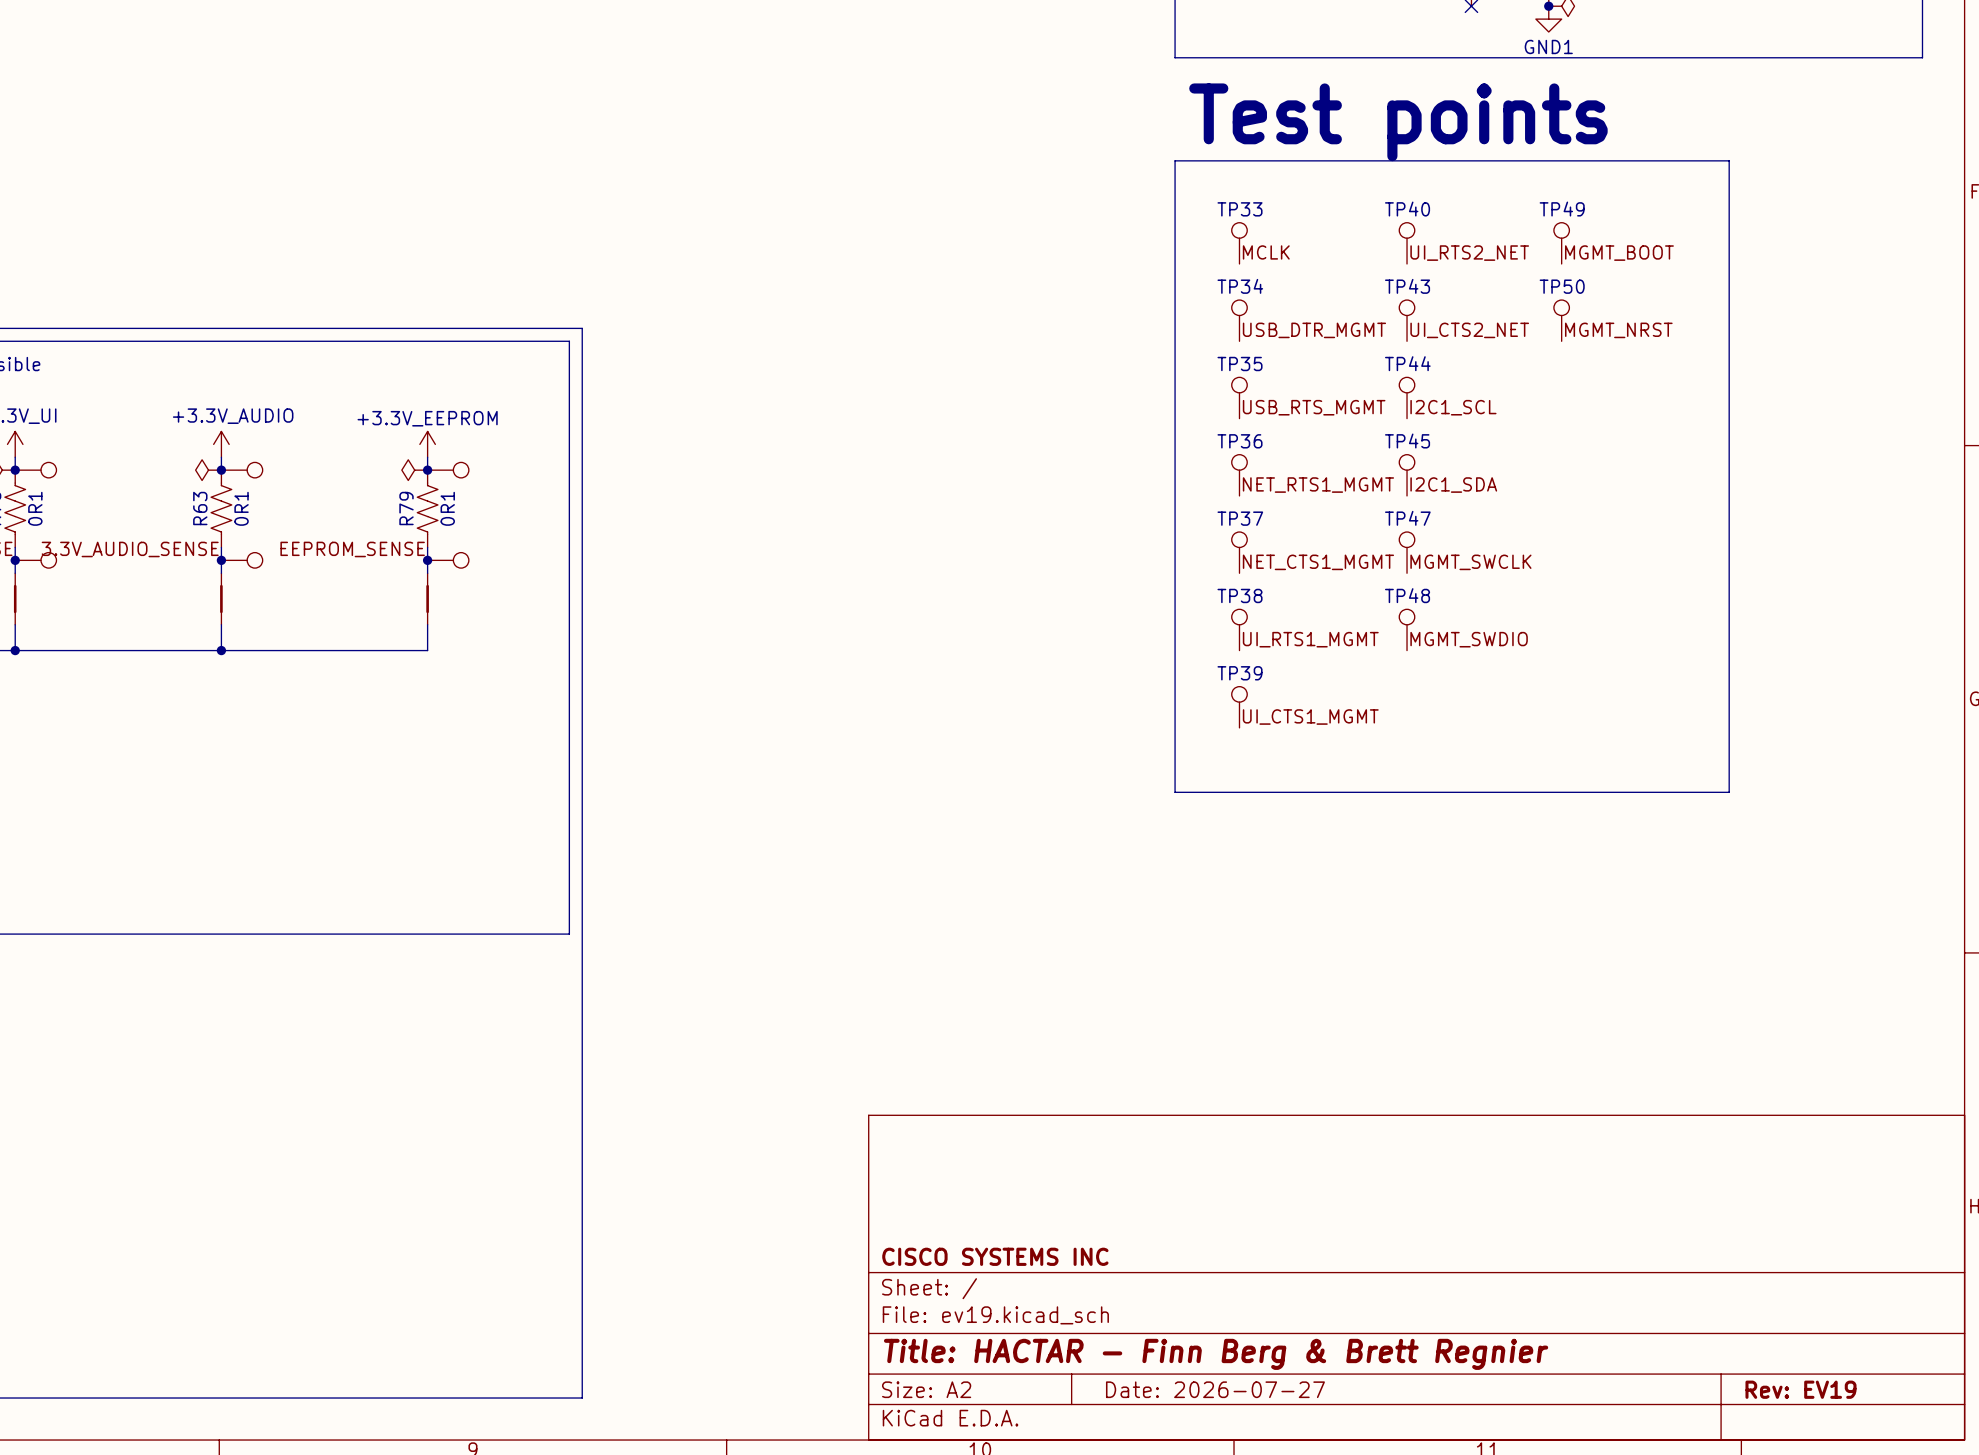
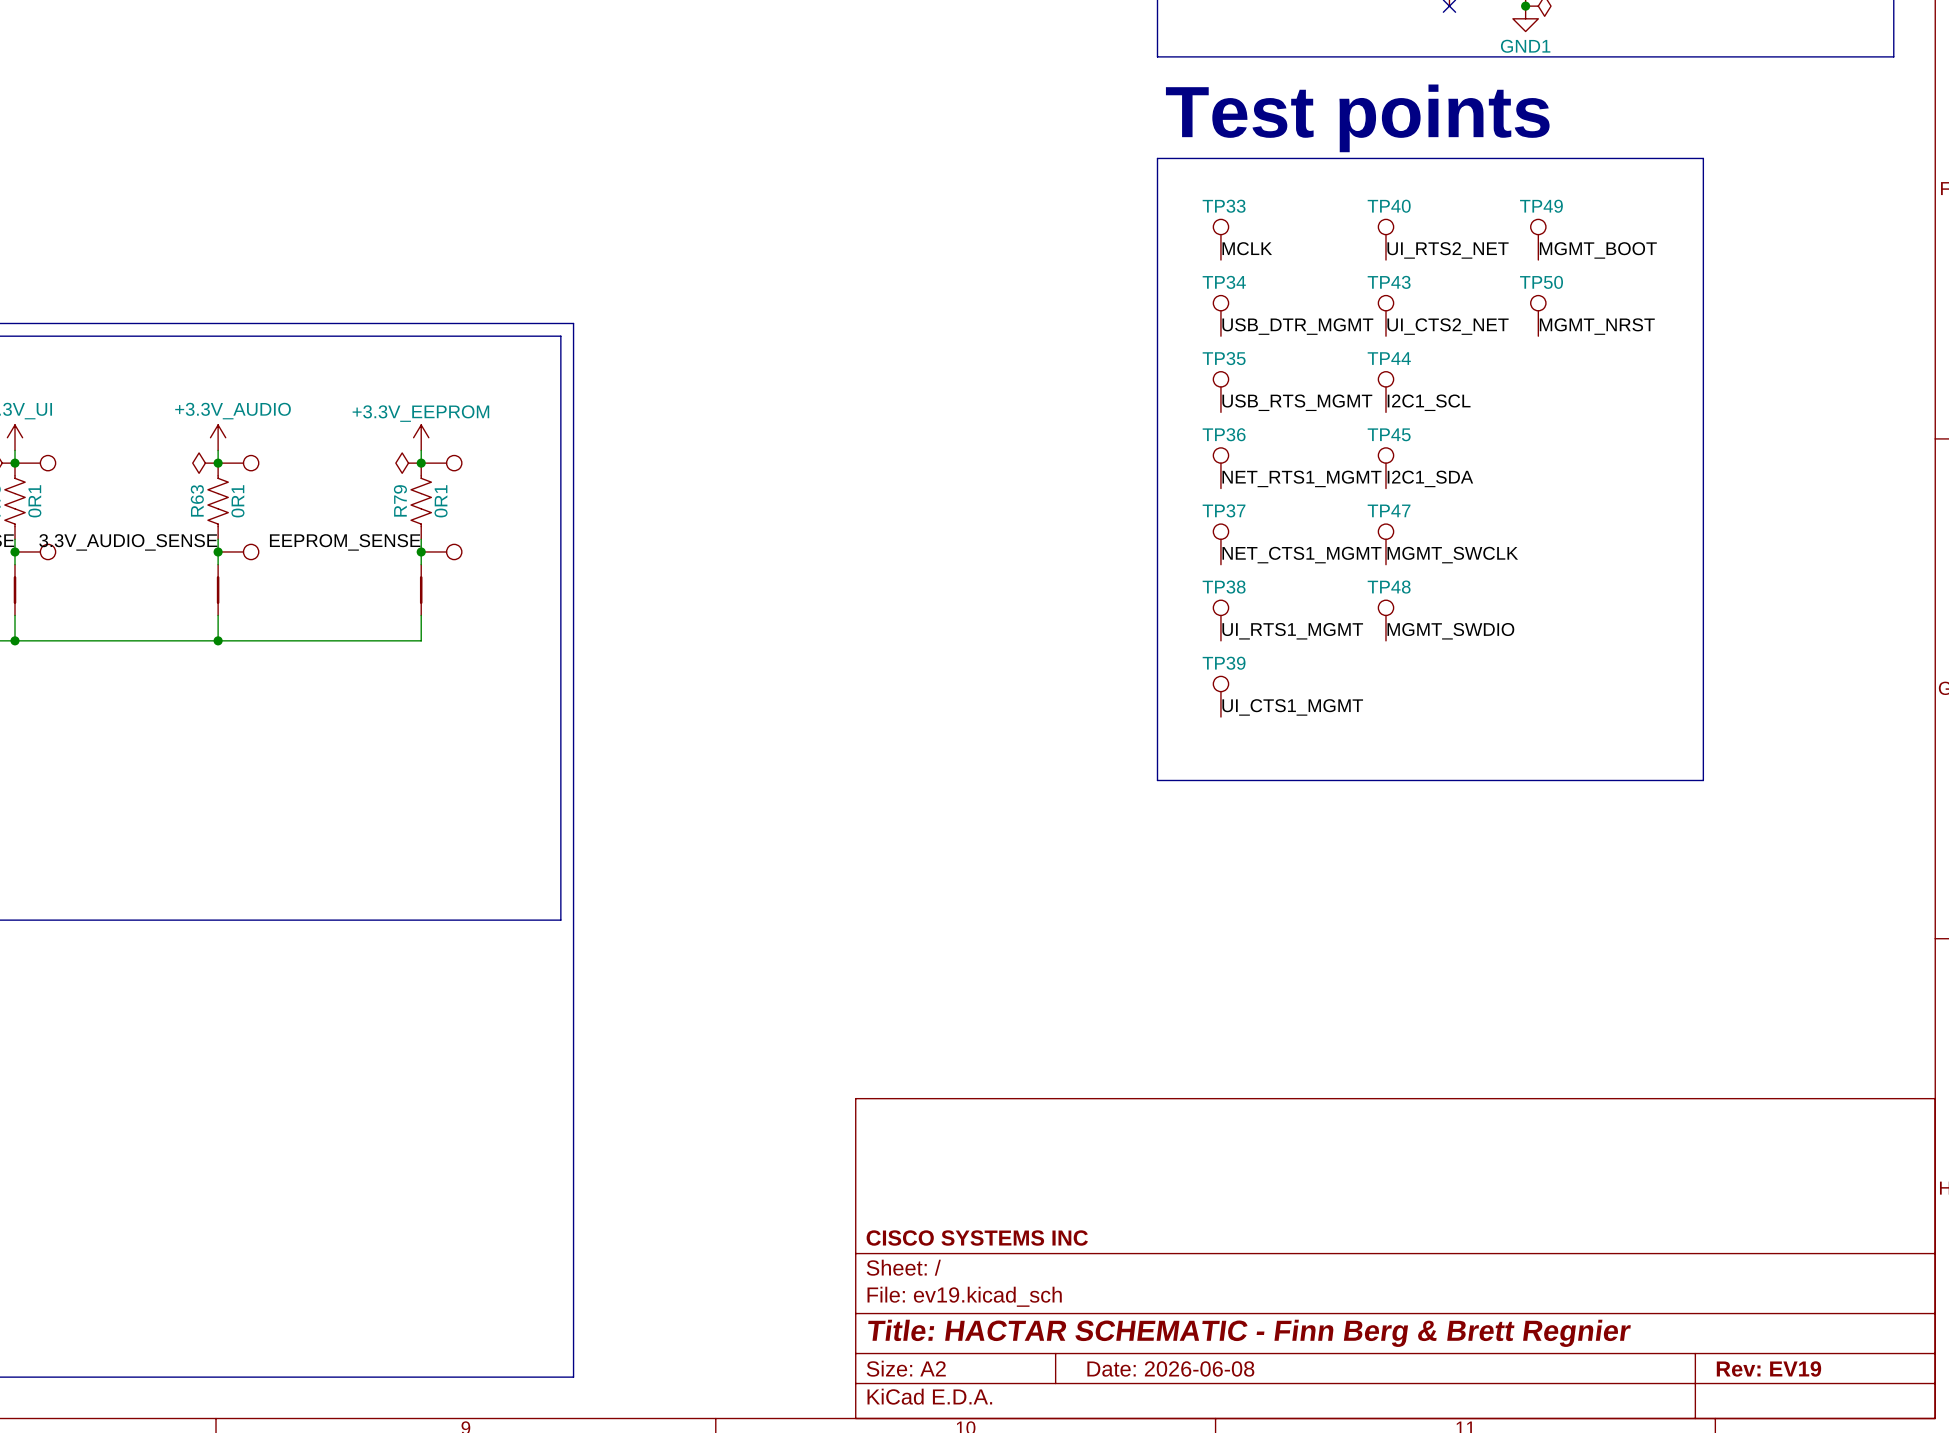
title block: Title: HACTAR - Finn Berg & Brett Regnier (1216, 1354) -> Title: HACTAR SCHEMATIC - Finn Berg & Brett Regnier (1249, 1333)
title block: Date: 2026-07-27 (1215, 1389) -> Date: 2026-06-08 (1170, 1368)

